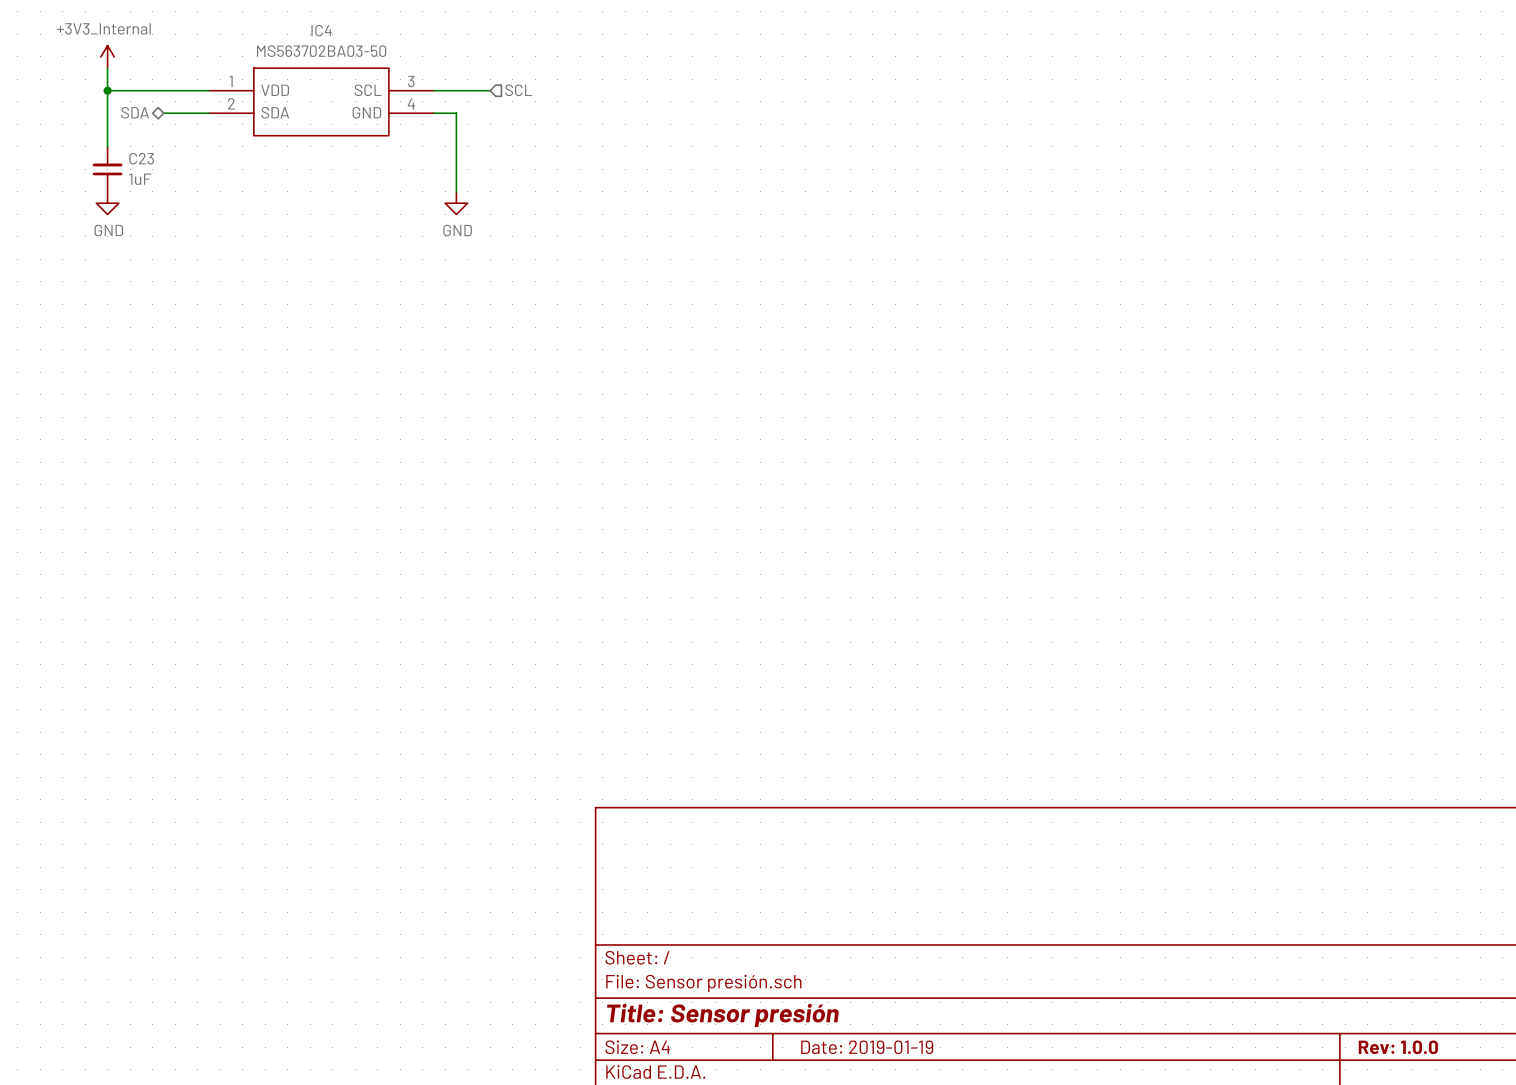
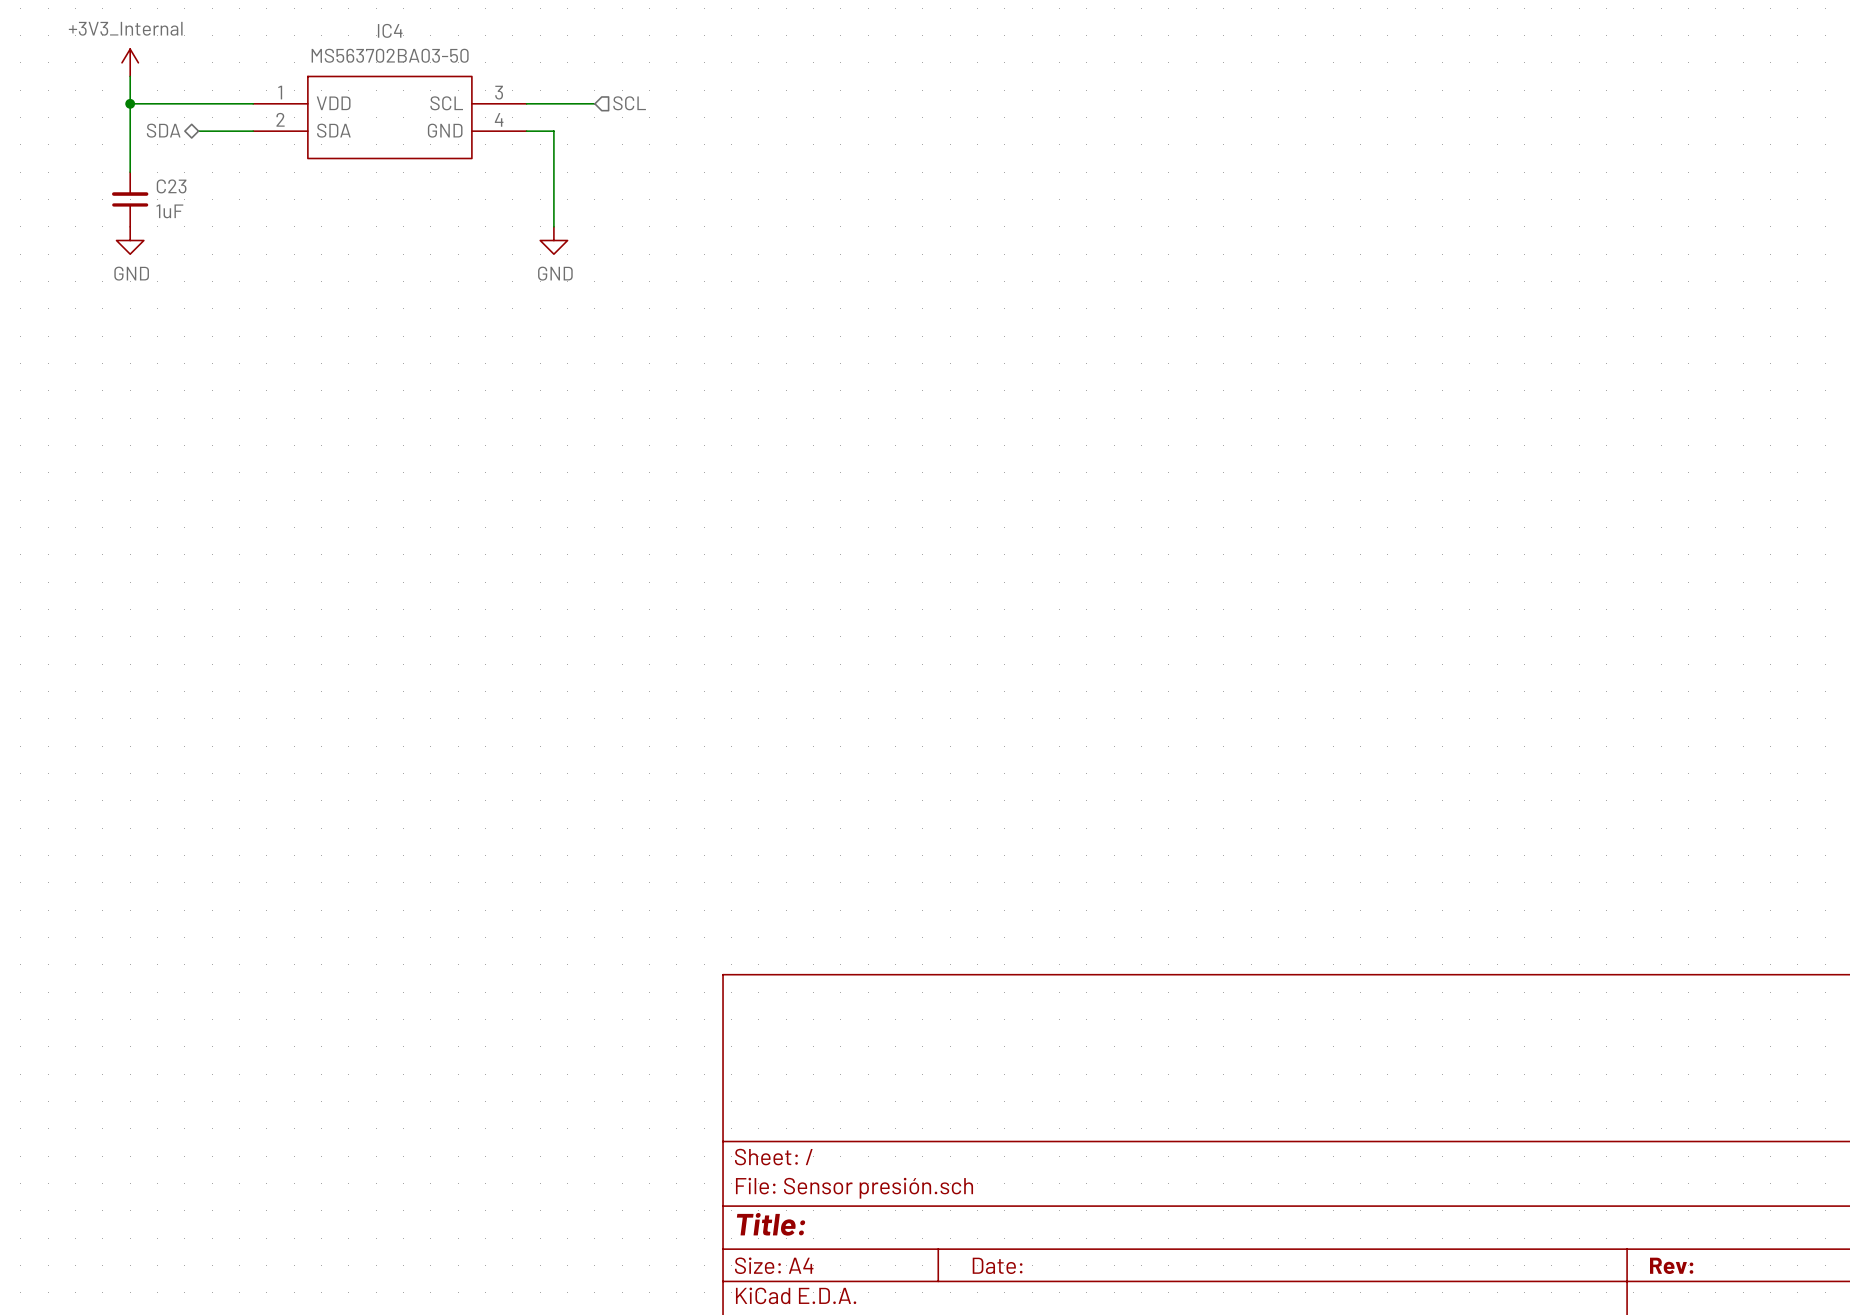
title block: Title: Sensor presión (722, 1015) -> Title: (771, 1224)
title block: Date: 2019-01-19 (867, 1047) -> Date: (997, 1265)
title block: Rev: 1.0.0 (1398, 1047) -> Rev: (1671, 1265)

